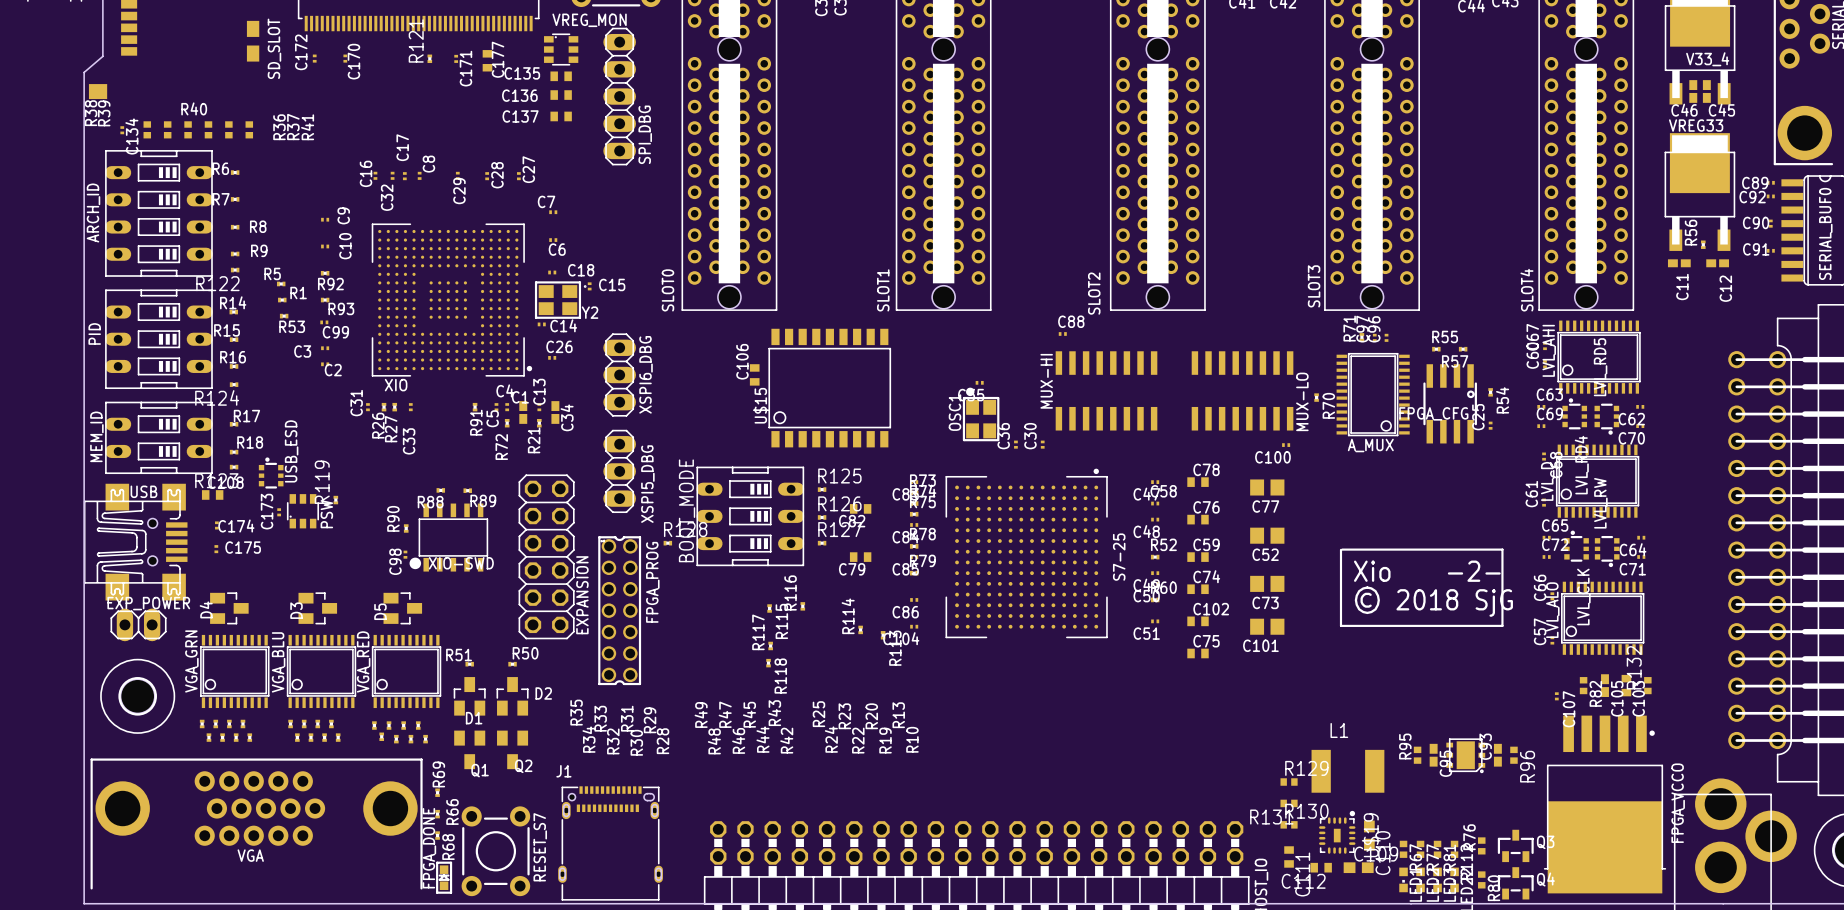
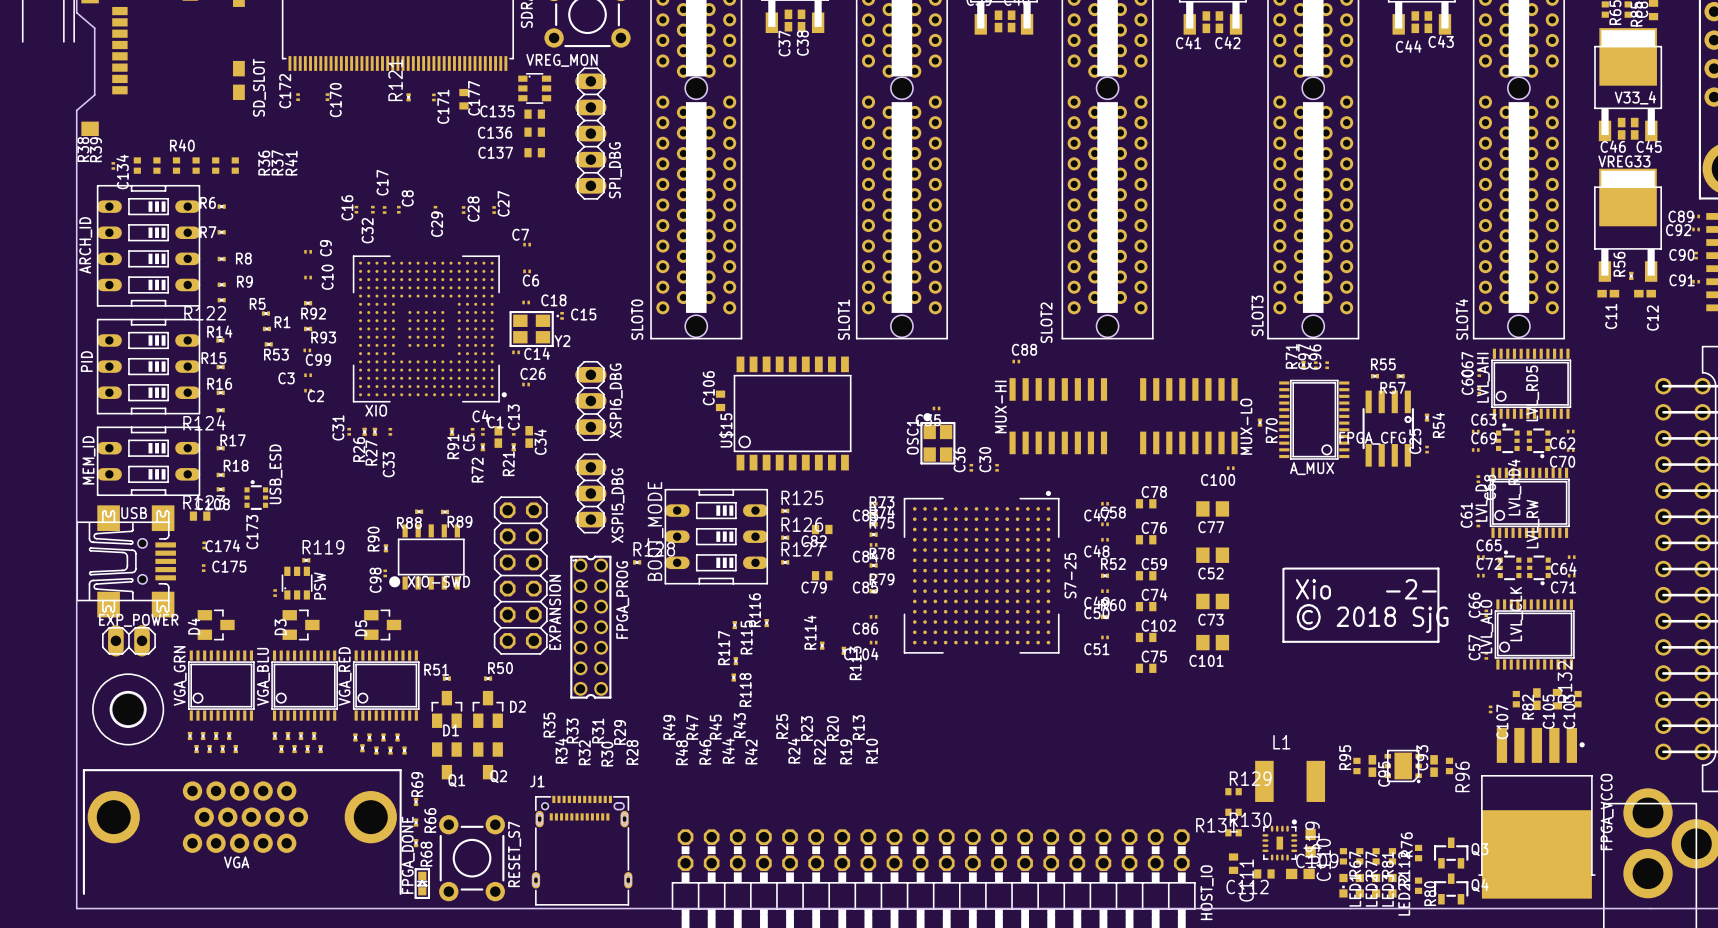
R119 rotation: 0° (335, 500) -> 90° clockwise (306, 560)
R119 position: (335, 500) -> (306, 560)
PSW position: (302, 511) -> (297, 583)
C173 position: (279, 512) -> (275, 593)

